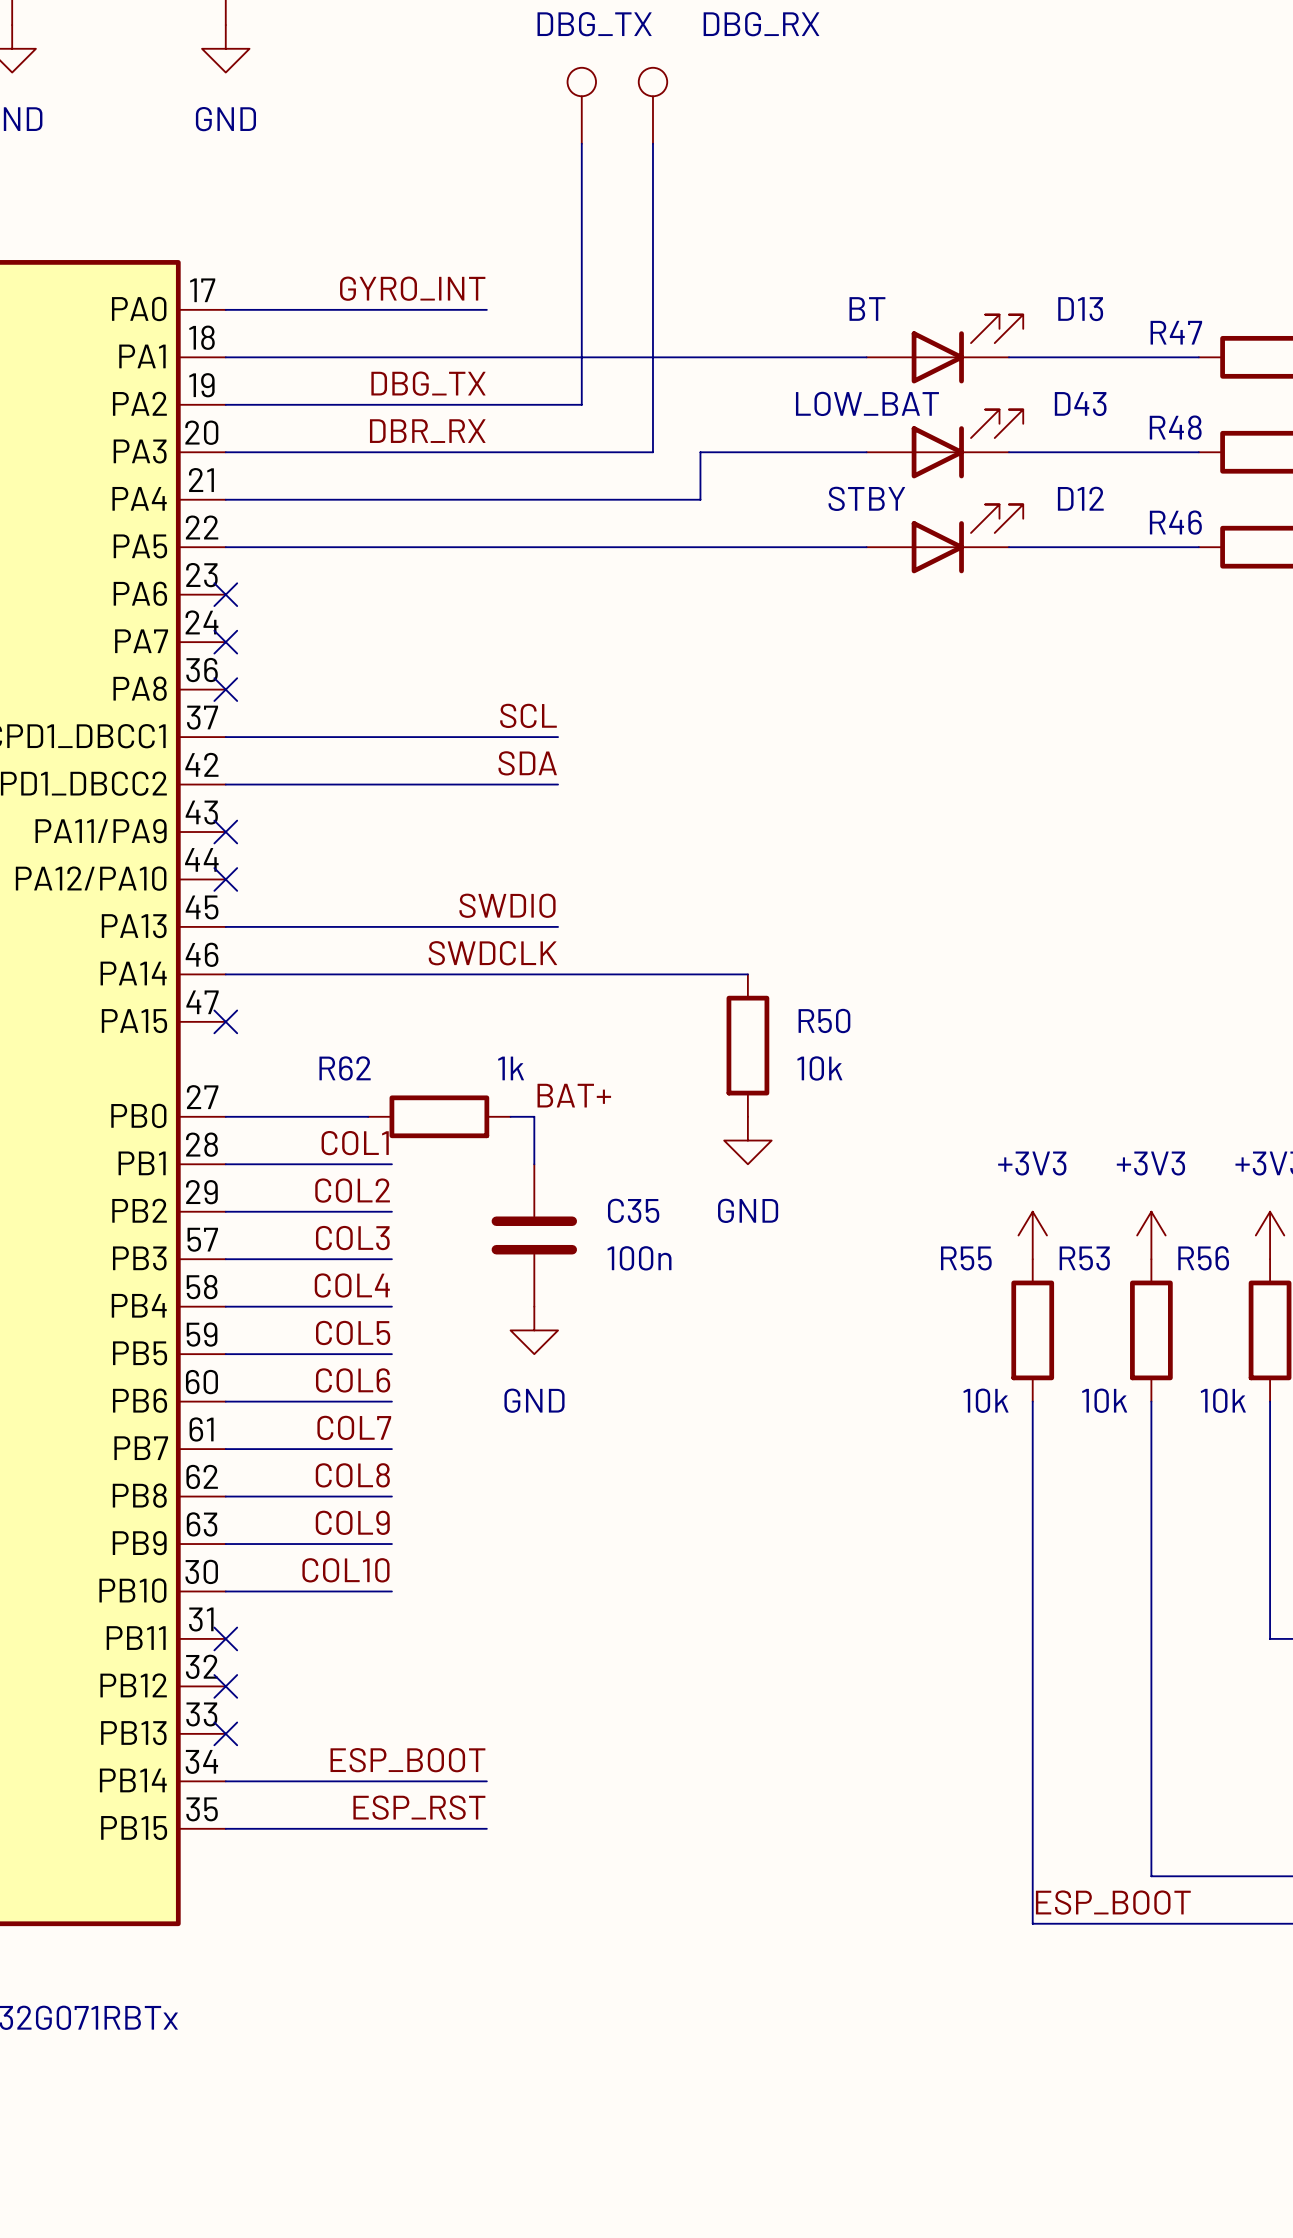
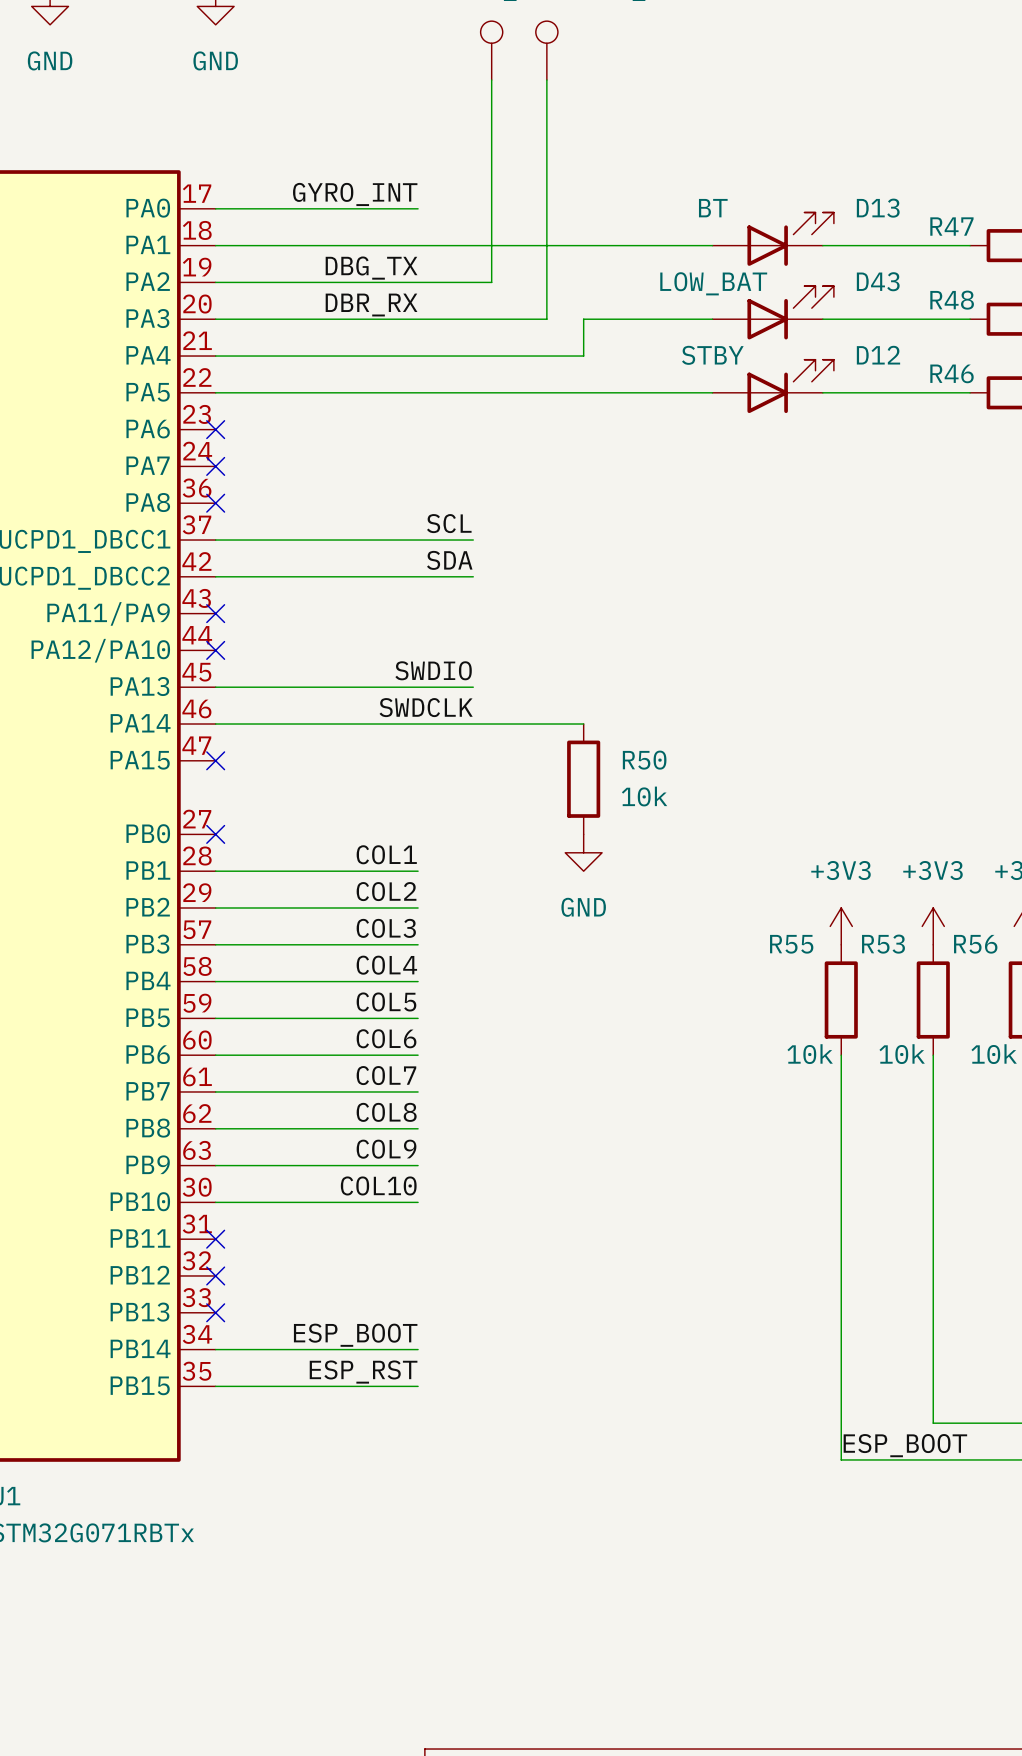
wire: (700, 974) (747, 974) -> none
R50 position: (747, 1045) -> (583, 779)
label: BAT+ (574, 1095) -> none
wire: (225, 1116) (368, 1116) -> none
no-connect mark: none -> (215, 834)
R62: 1k (439, 1116) -> none
wire: (510, 1116) (534, 1116) (534, 1164) -> none
power symbol position: GND (747, 1140) -> GND (583, 852)
label position: COL1 (355, 1143) -> COL1 (386, 854)
wire: none -> (344, 871) (418, 871)
label position: COL2 (352, 1190) -> COL2 (386, 891)
wire: none -> (344, 907) (418, 907)
C35: 100n (534, 1235) -> none
label position: COL3 (352, 1238) -> COL3 (386, 928)
wire: none -> (344, 944) (418, 944)
label position: COL4 (352, 1285) -> COL4 (386, 965)
wire: none -> (344, 981) (418, 981)
power symbol: GND (534, 1330) -> none
label position: COL5 (353, 1332) -> COL5 (386, 1001)
wire: none -> (344, 1018) (418, 1018)
label position: COL6 (353, 1380) -> COL6 (386, 1038)
wire: none -> (344, 1055) (418, 1055)
label position: COL7 (354, 1427) -> COL7 (386, 1075)
wire: none -> (344, 1091) (418, 1091)
label position: COL8 (352, 1475) -> COL8 (386, 1112)
wire: none -> (344, 1128) (418, 1128)
label position: COL9 (352, 1522) -> COL9 (386, 1149)
wire: none -> (344, 1165) (418, 1165)
label position: COL10 (345, 1570) -> COL10 (378, 1185)
wire: none -> (344, 1202) (418, 1202)

